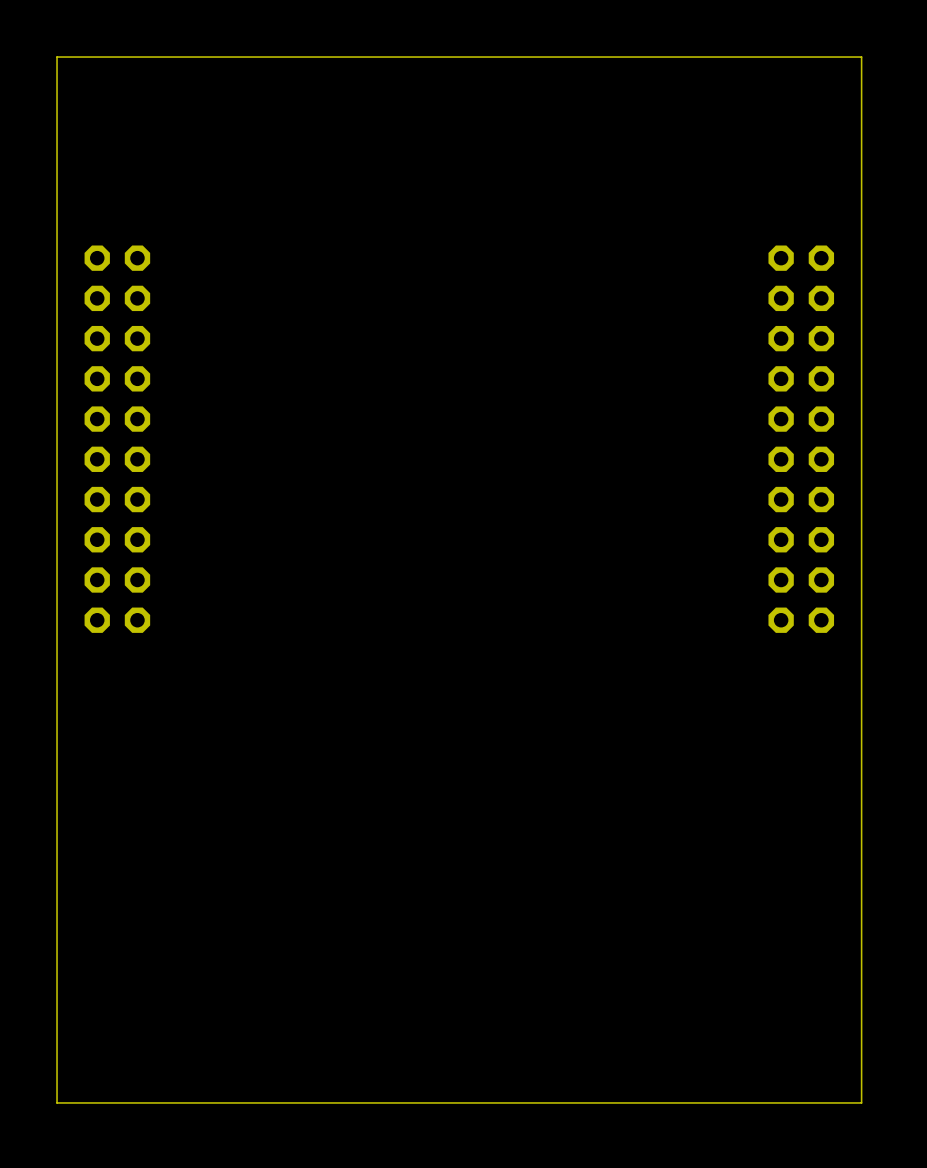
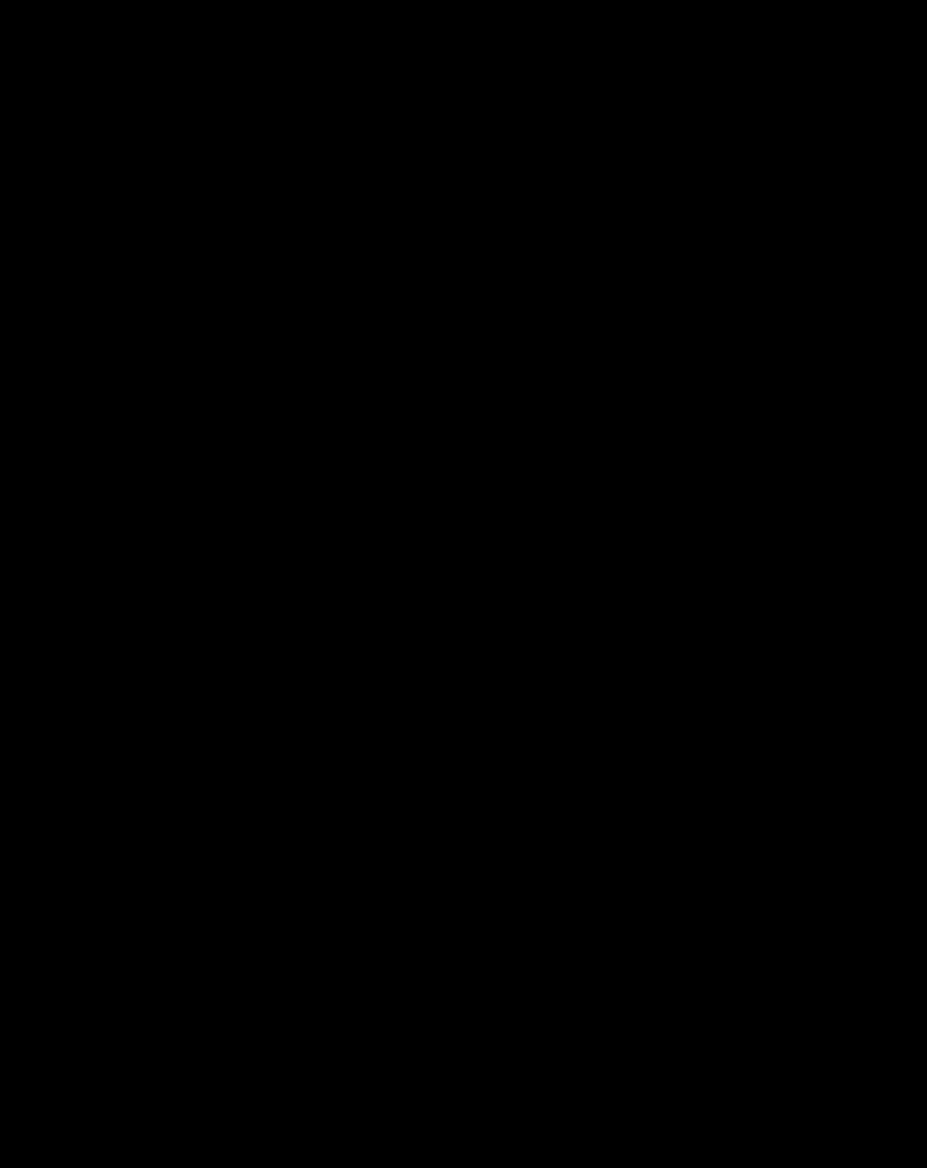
part: (459, 579) -> none

